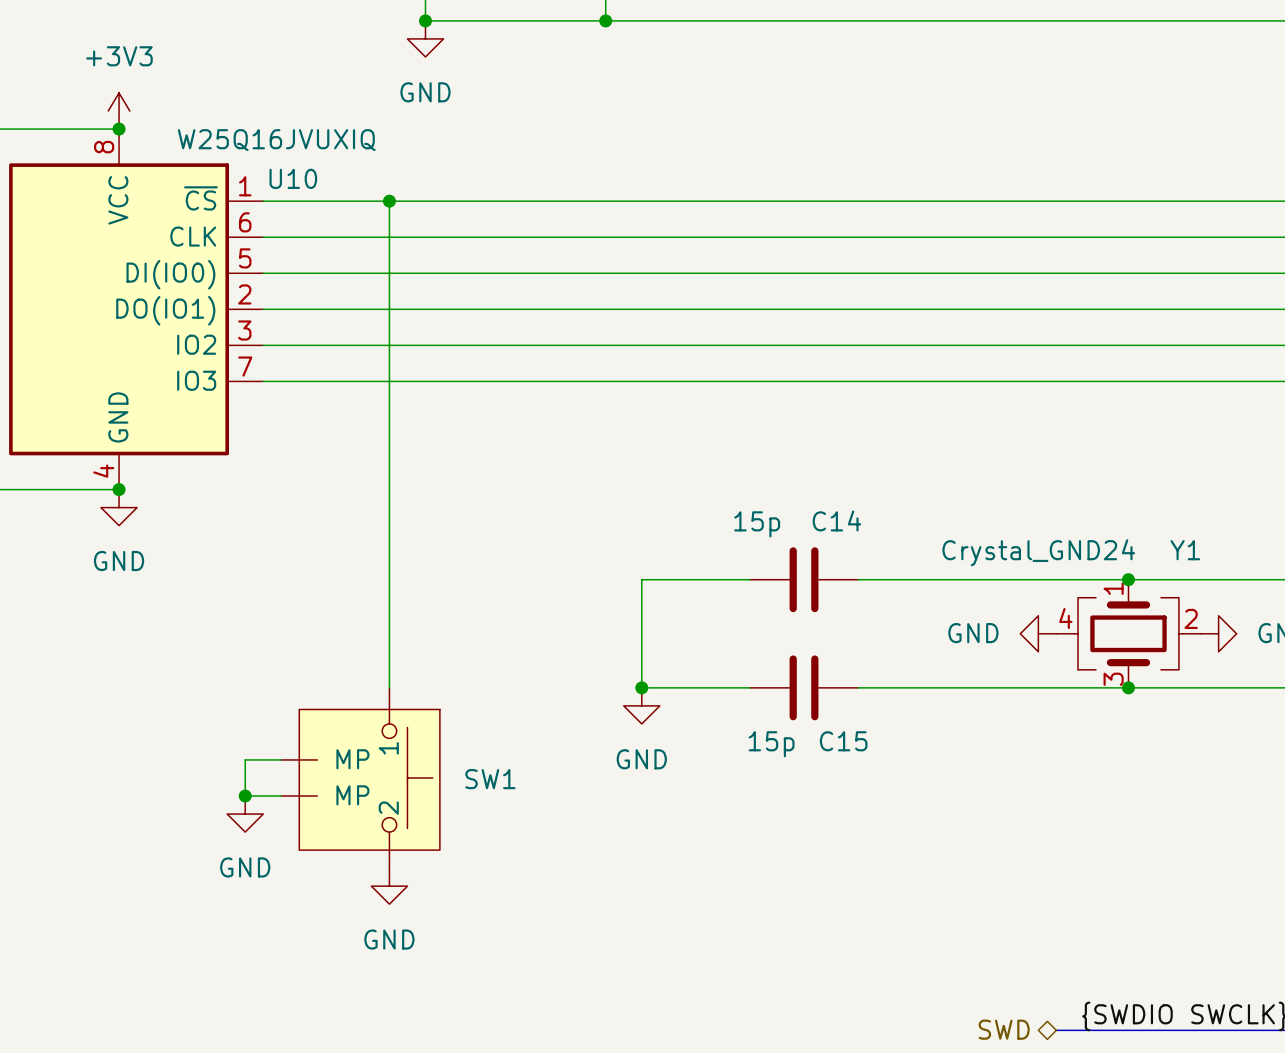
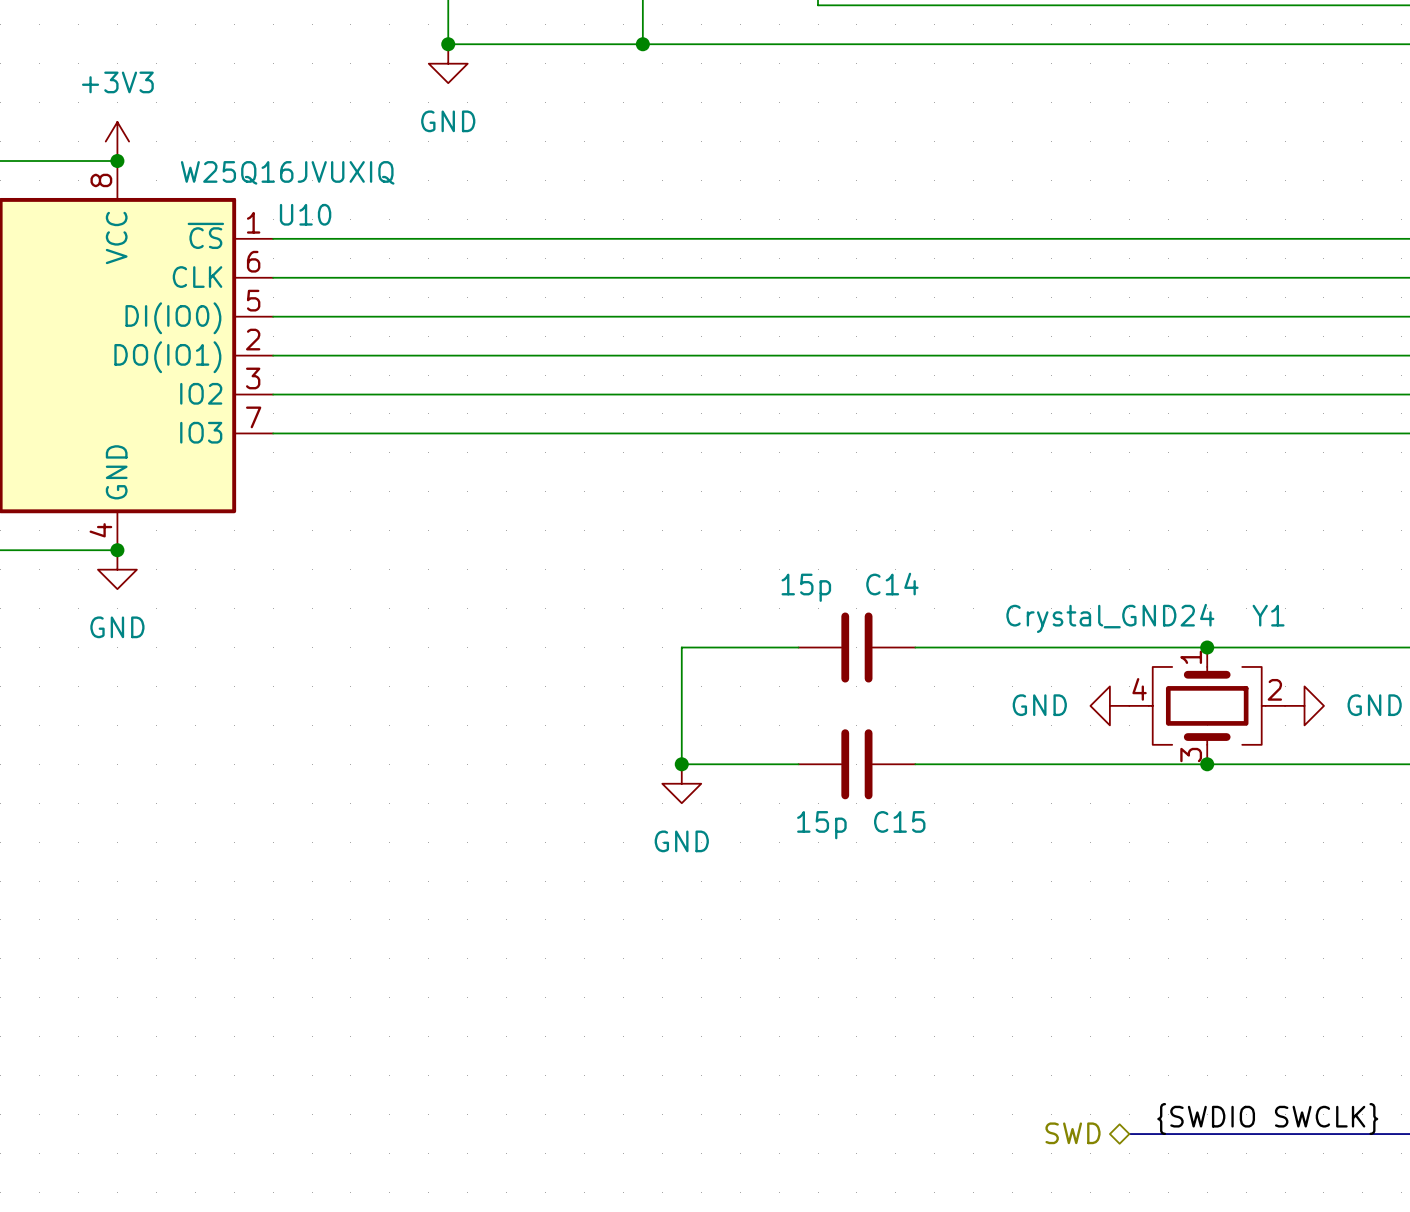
wire: (389, 201) (389, 687) -> none
junction: (389, 201) -> none
wire: (281, 759) (245, 759) (245, 796) (281, 796) -> none
SW1: (360, 777) -> none
junction: (245, 796) -> none
power symbol: GND (245, 814) -> none
power symbol: GND (389, 886) -> none

